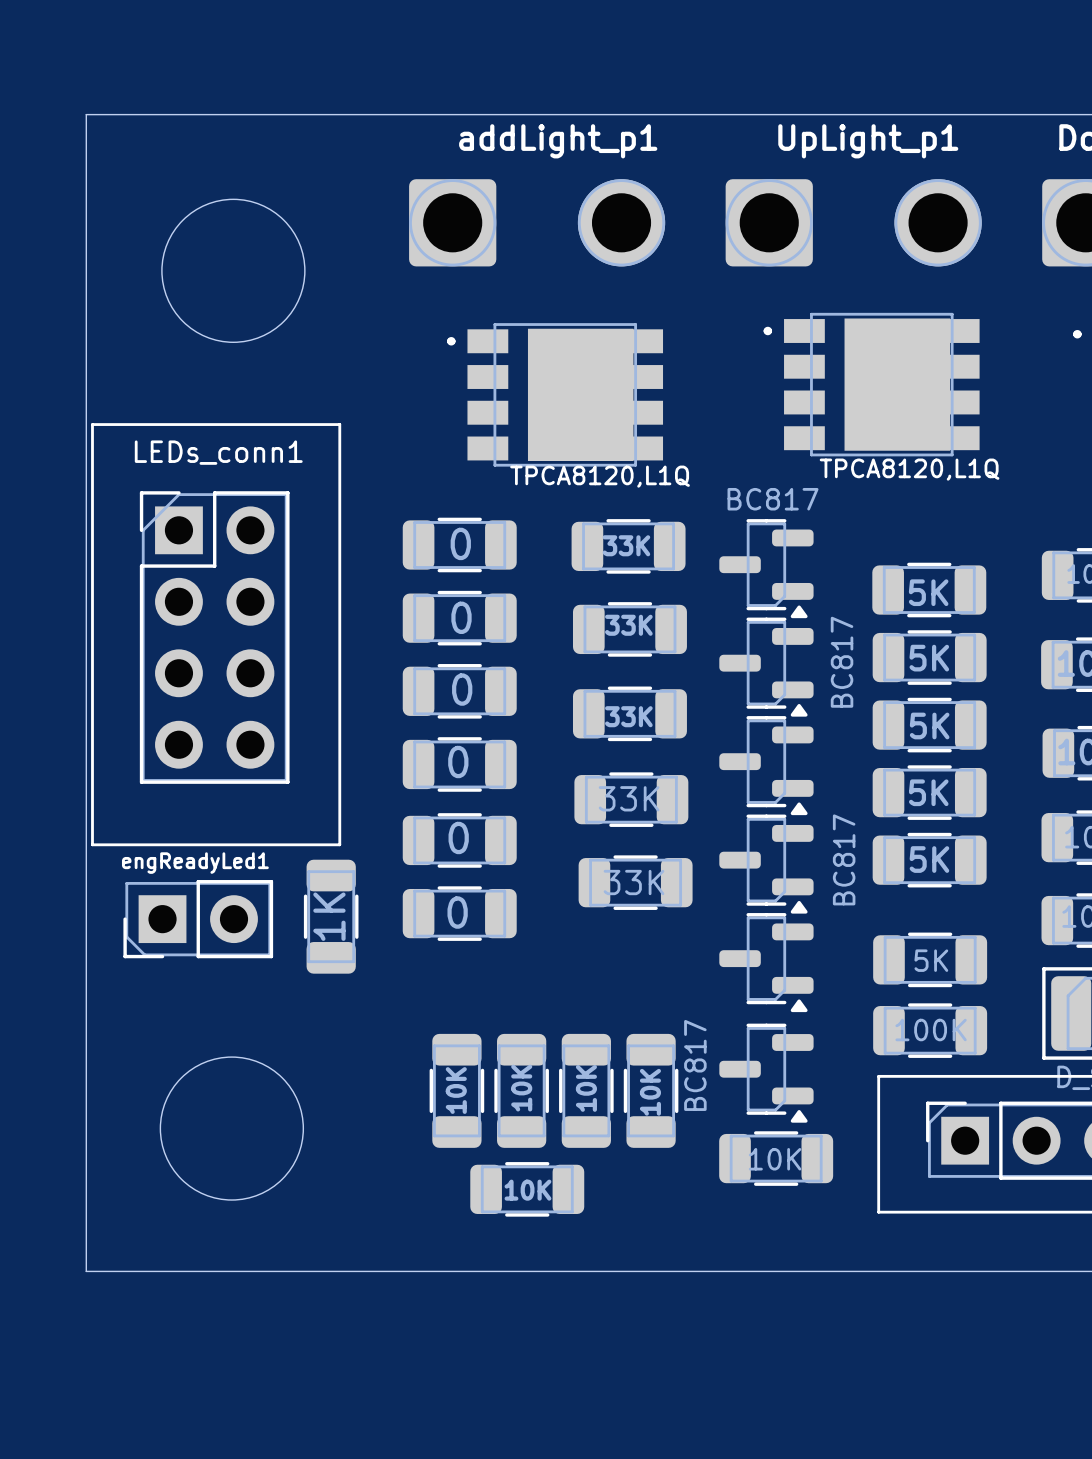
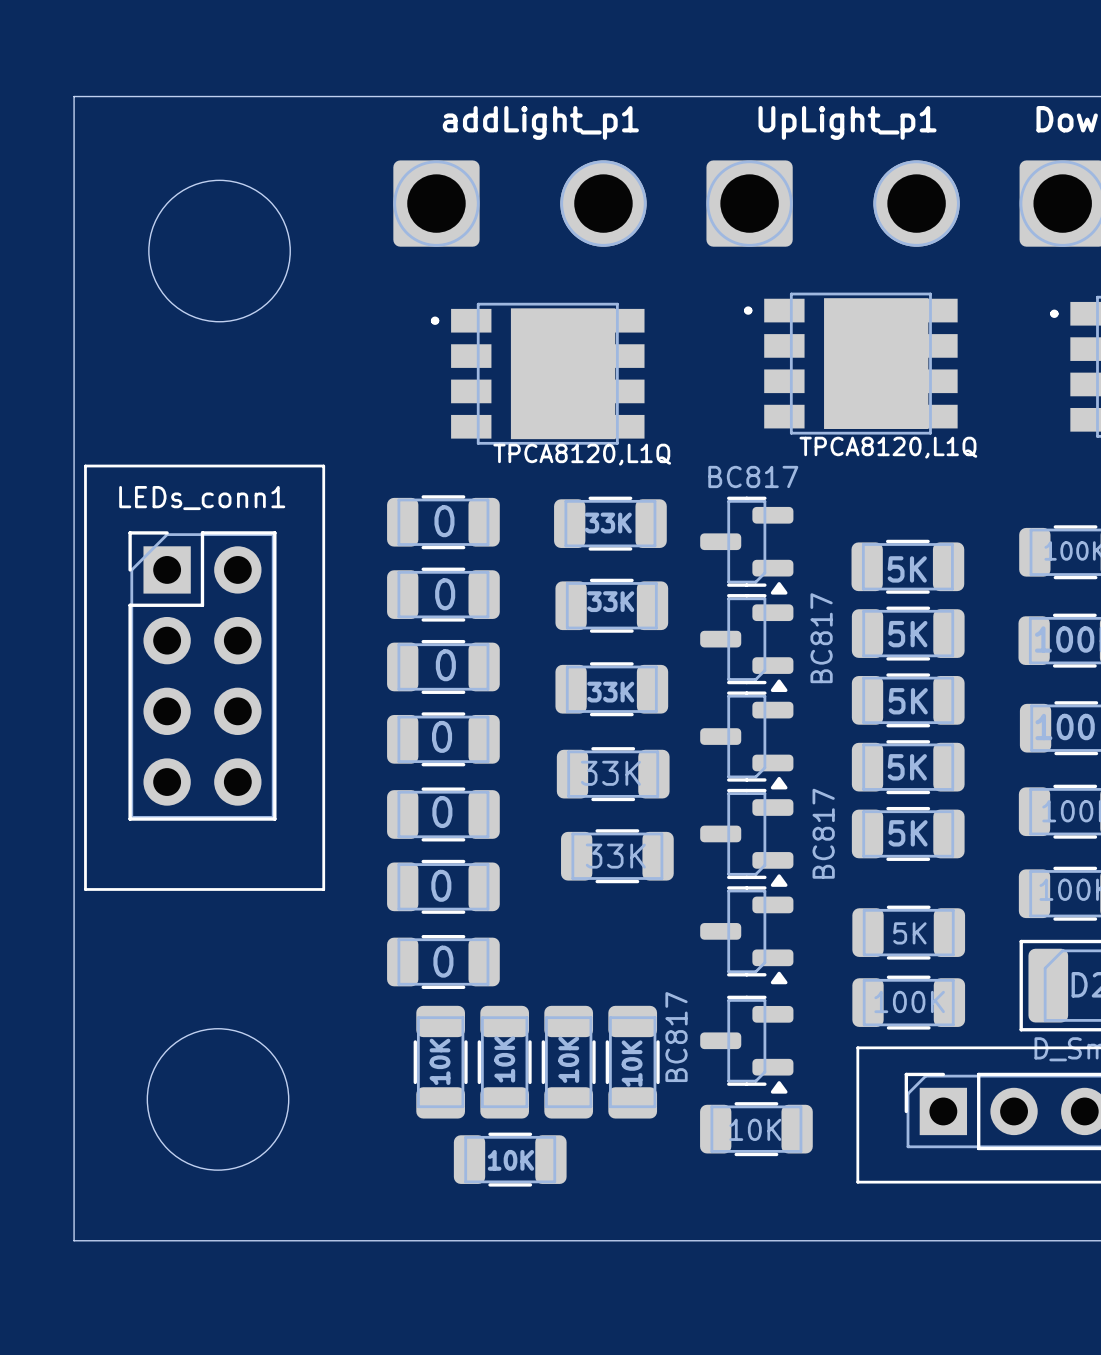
line: (92, 424) (339, 424) (339, 844) (92, 844) (92, 424) -> (85, 466) (85, 889) (323, 889) (323, 466) (85, 466)
LEDs_conn1 name position: LEDs_conn1 (218, 452) -> LEDs_conn1 (202, 498)
LEDs_conn1 position: (214, 637) -> (202, 675)
part: 1K (331, 916) -> none
engReadyLed1: (198, 919) -> none
part: none -> 0 (443, 961)

